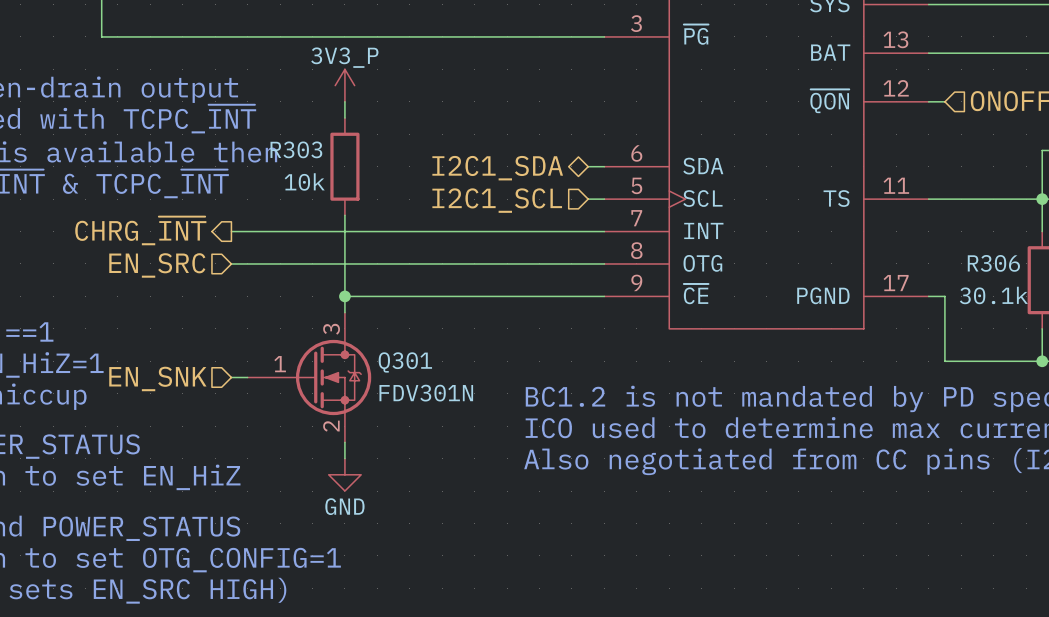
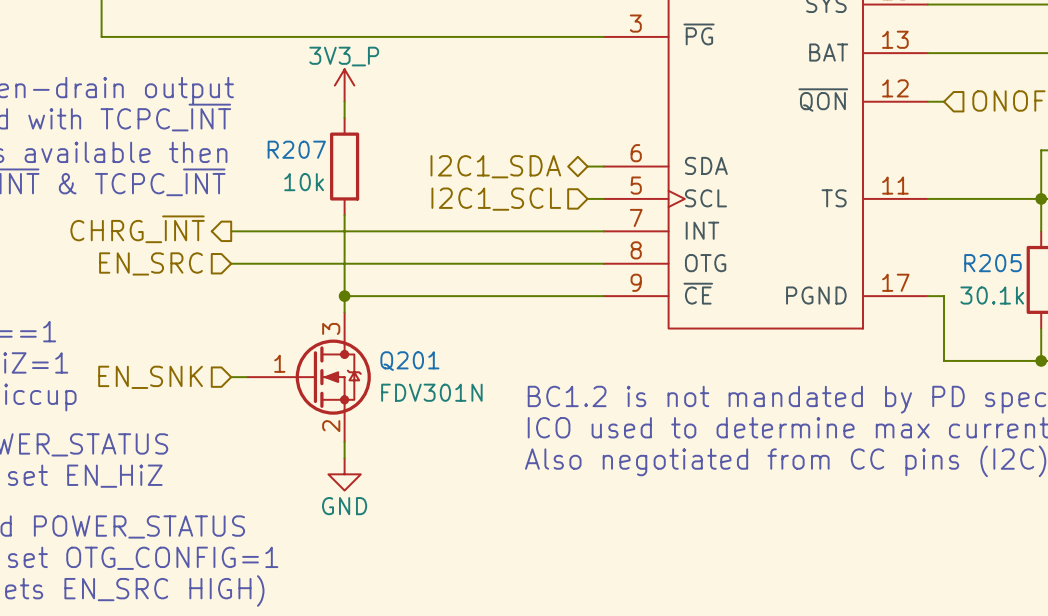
R303 name: R303 (296, 149) -> R207 (296, 149)
R306 name: R306 (993, 263) -> R205 (992, 263)
Q301 name: Q301 (405, 362) -> Q201 (409, 361)

